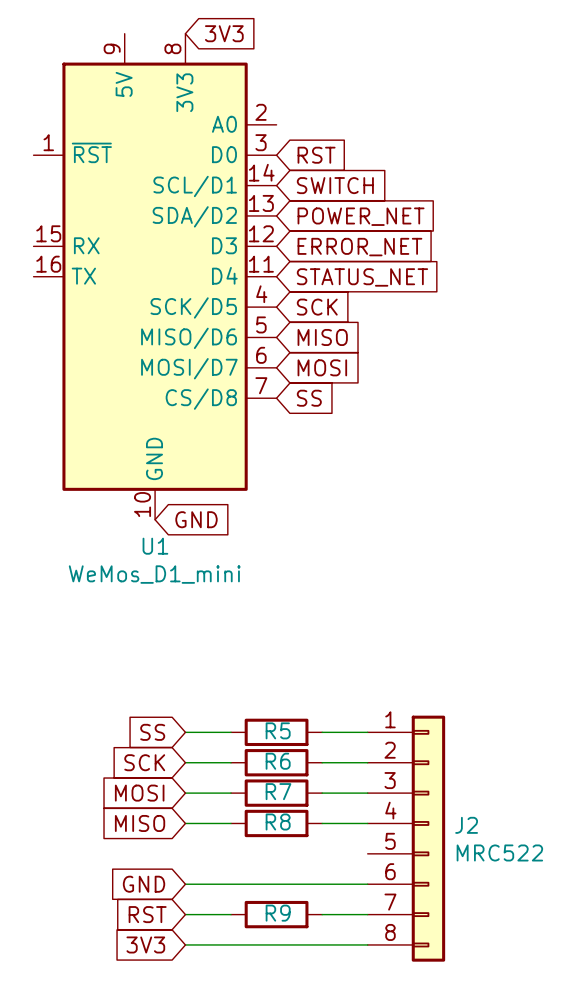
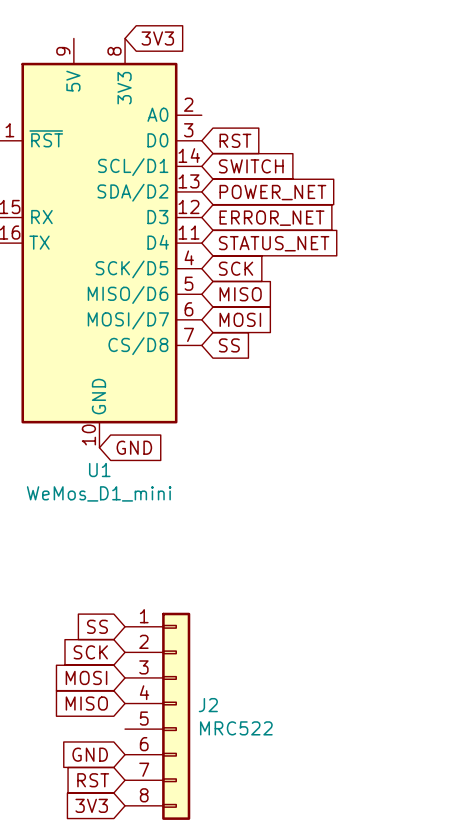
R5: (276, 732) -> none
wire: (322, 732) (367, 732) -> none
R6: (276, 762) -> none
wire: (322, 762) (367, 762) -> none
R7: (276, 793) -> none
wire: (322, 793) (367, 793) -> none
R8: (276, 823) -> none
wire: (322, 823) (367, 823) -> none
J2 position: (406, 838) -> (157, 716)
wire: (185, 884) (367, 884) -> none
R9: (276, 914) -> none
wire: (322, 914) (367, 914) -> none
wire: (185, 944) (367, 944) -> none

